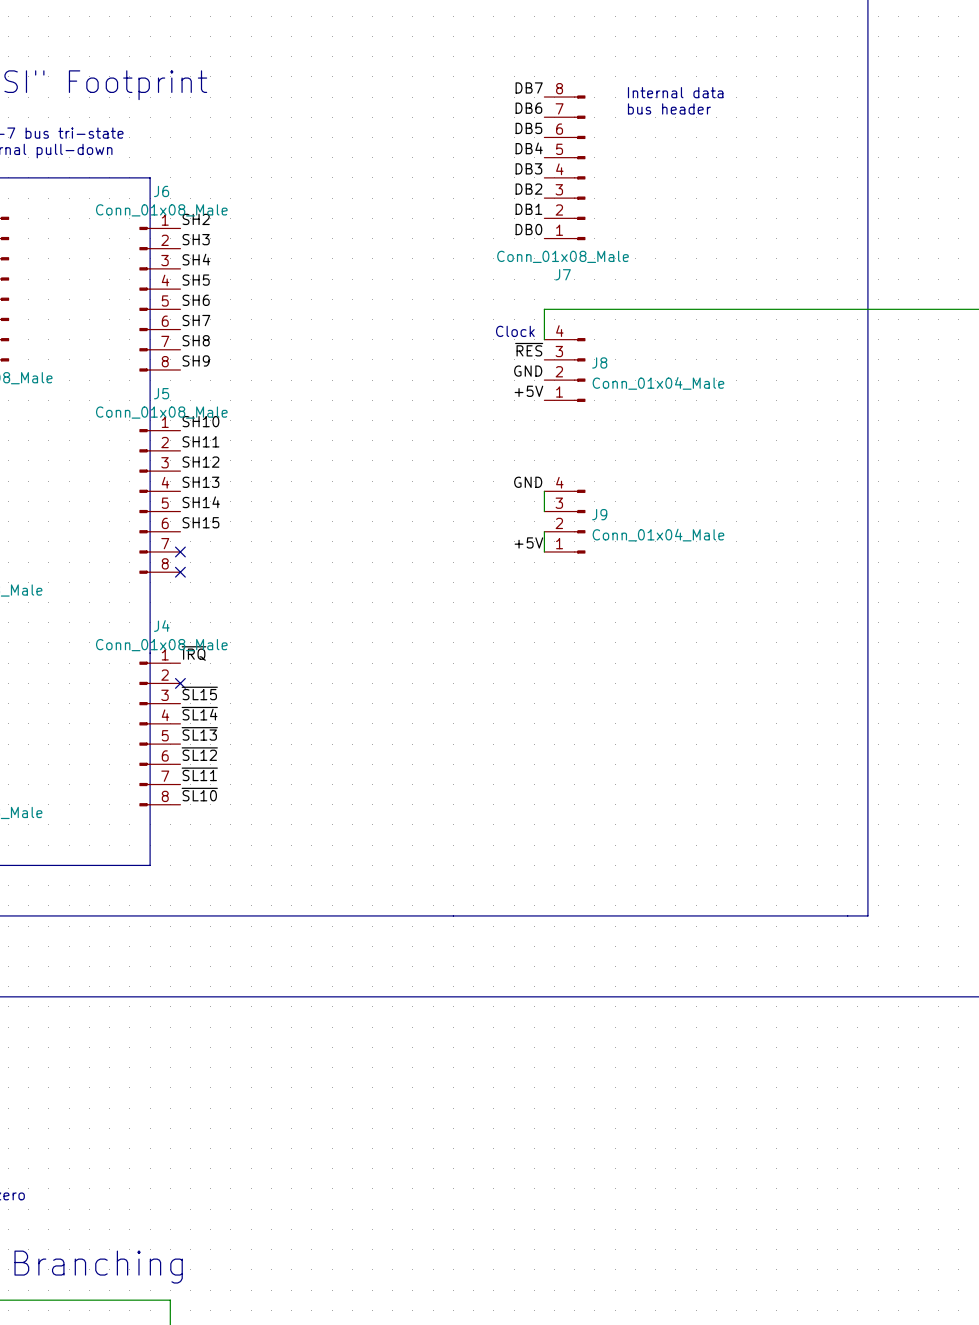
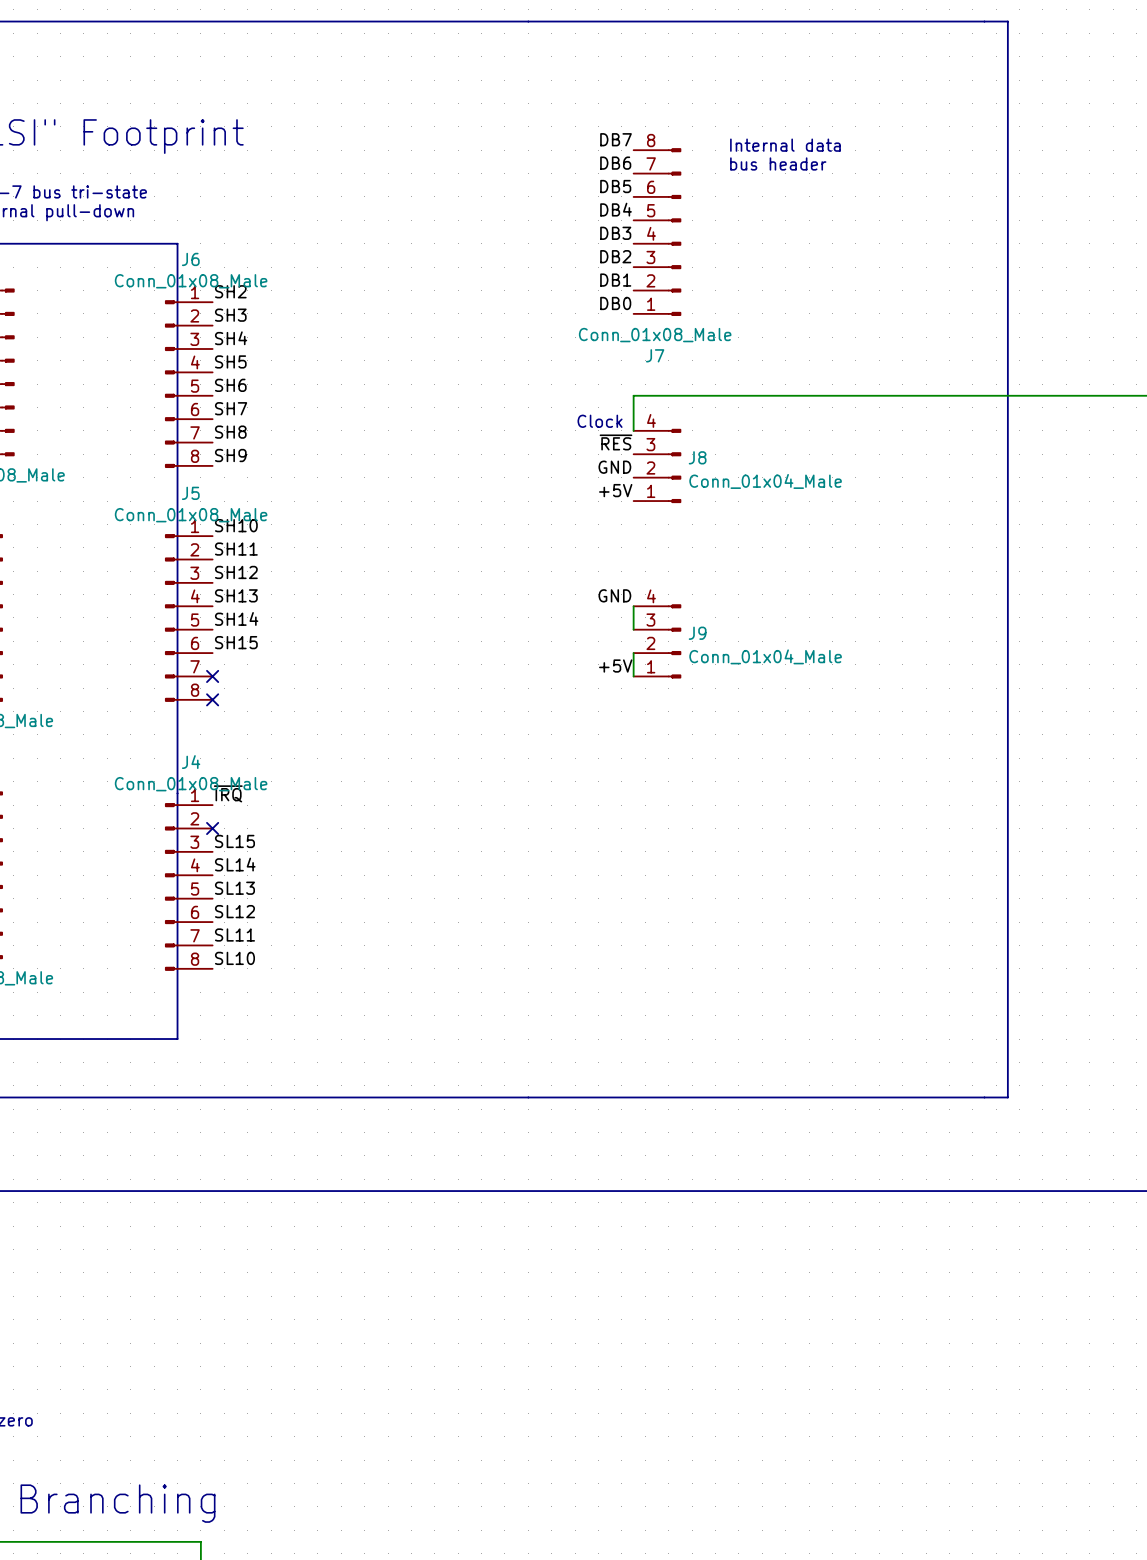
label: ~{SL15} (199, 693) -> SL15 (234, 841)
label: ~{SL14} (199, 713) -> SL14 (235, 864)
label: ~{SL13} (199, 733) -> SL13 (234, 888)
label: ~{SL12} (199, 754) -> SL12 (234, 911)
label: ~{SL11} (199, 774) -> SL11 (234, 935)
label: ~{SL10} (199, 794) -> SL10 (234, 958)

